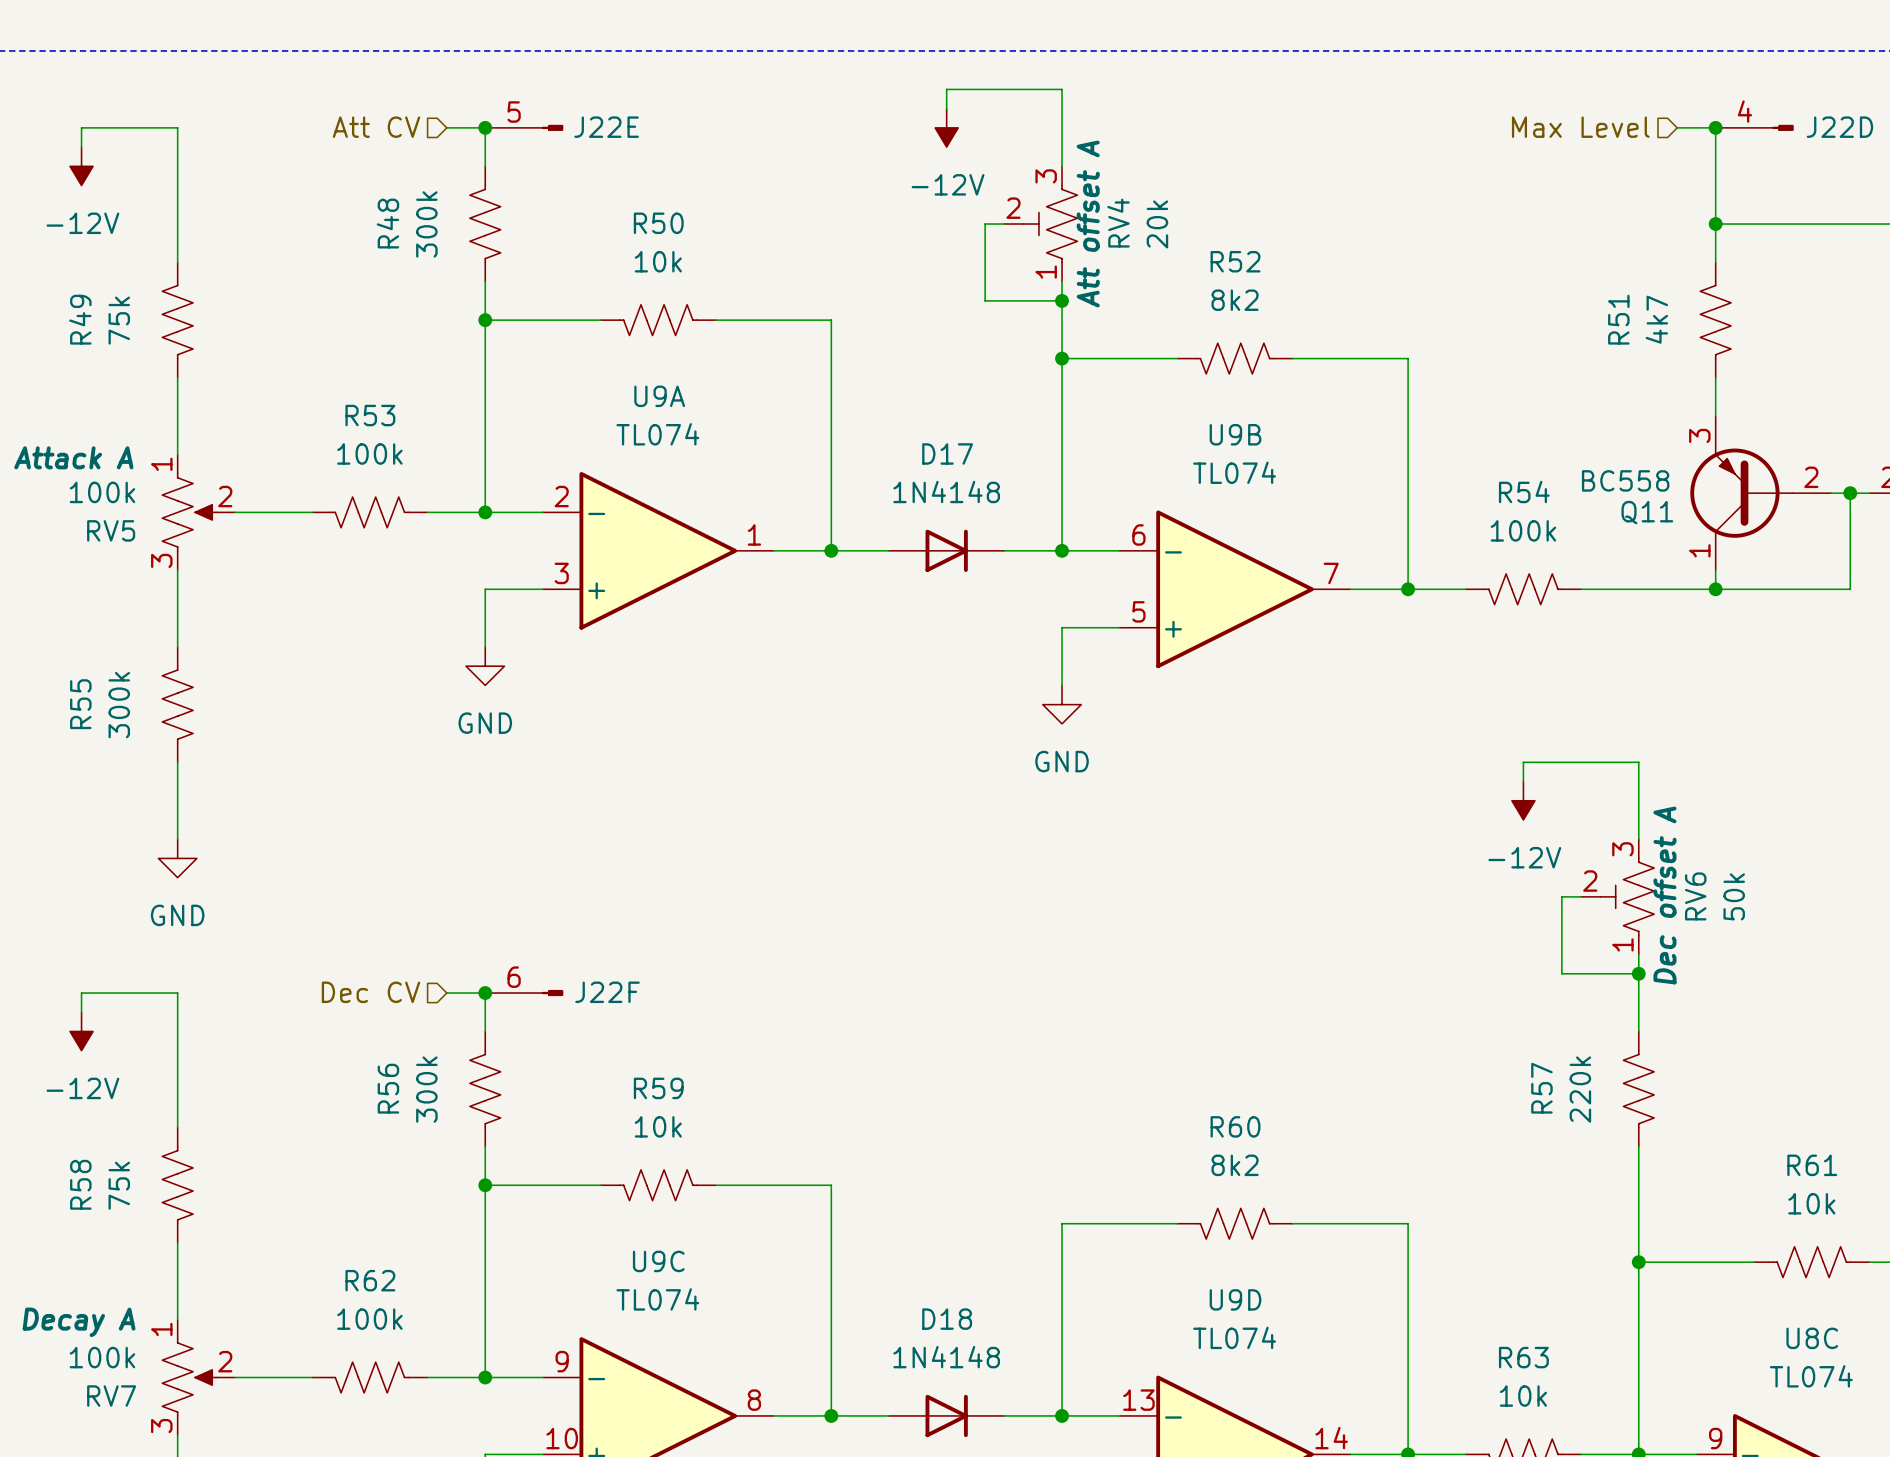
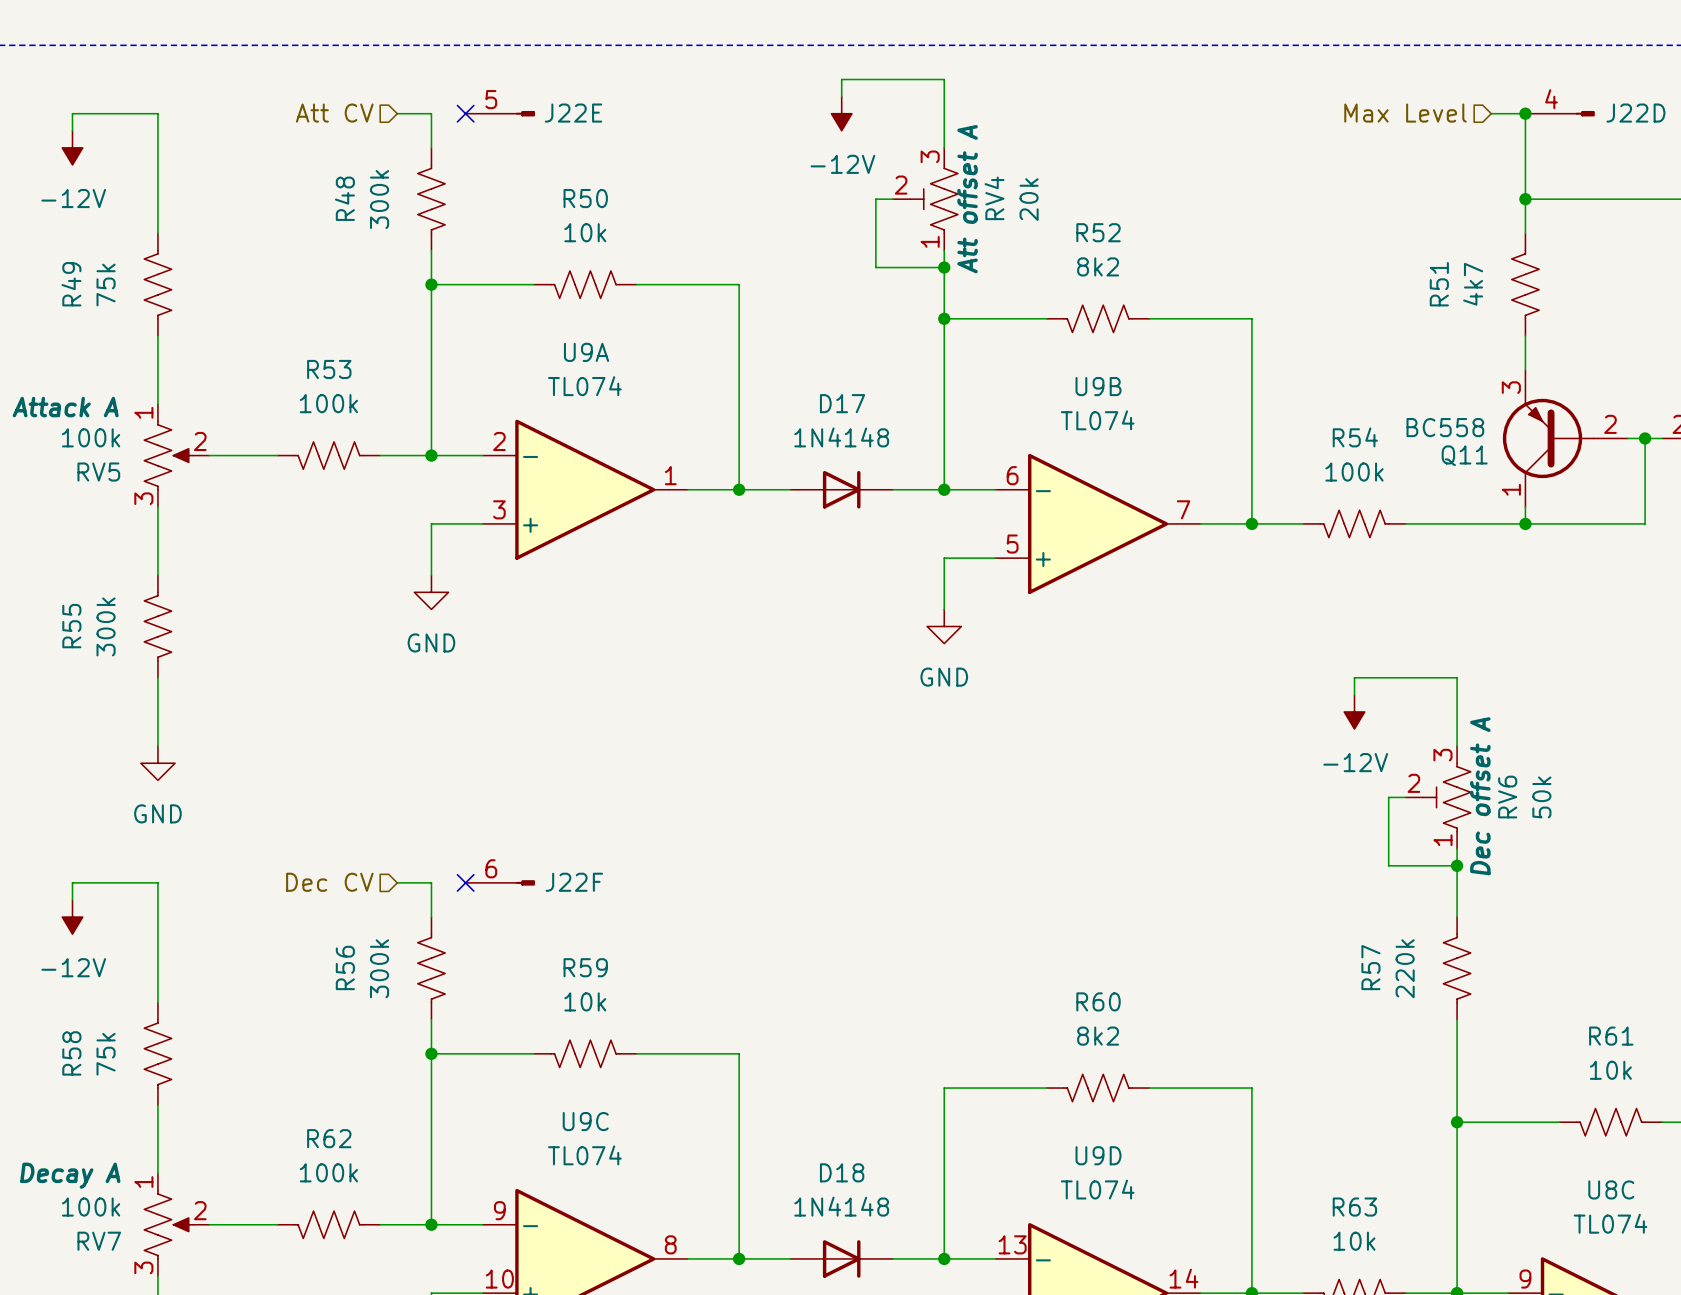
junction: (485, 127) -> none
no-connect mark: none -> (465, 113)
J22E position: (524, 127) -> (500, 113)
junction: (485, 993) -> none
no-connect mark: none -> (465, 882)
J22F position: (524, 993) -> (500, 882)

